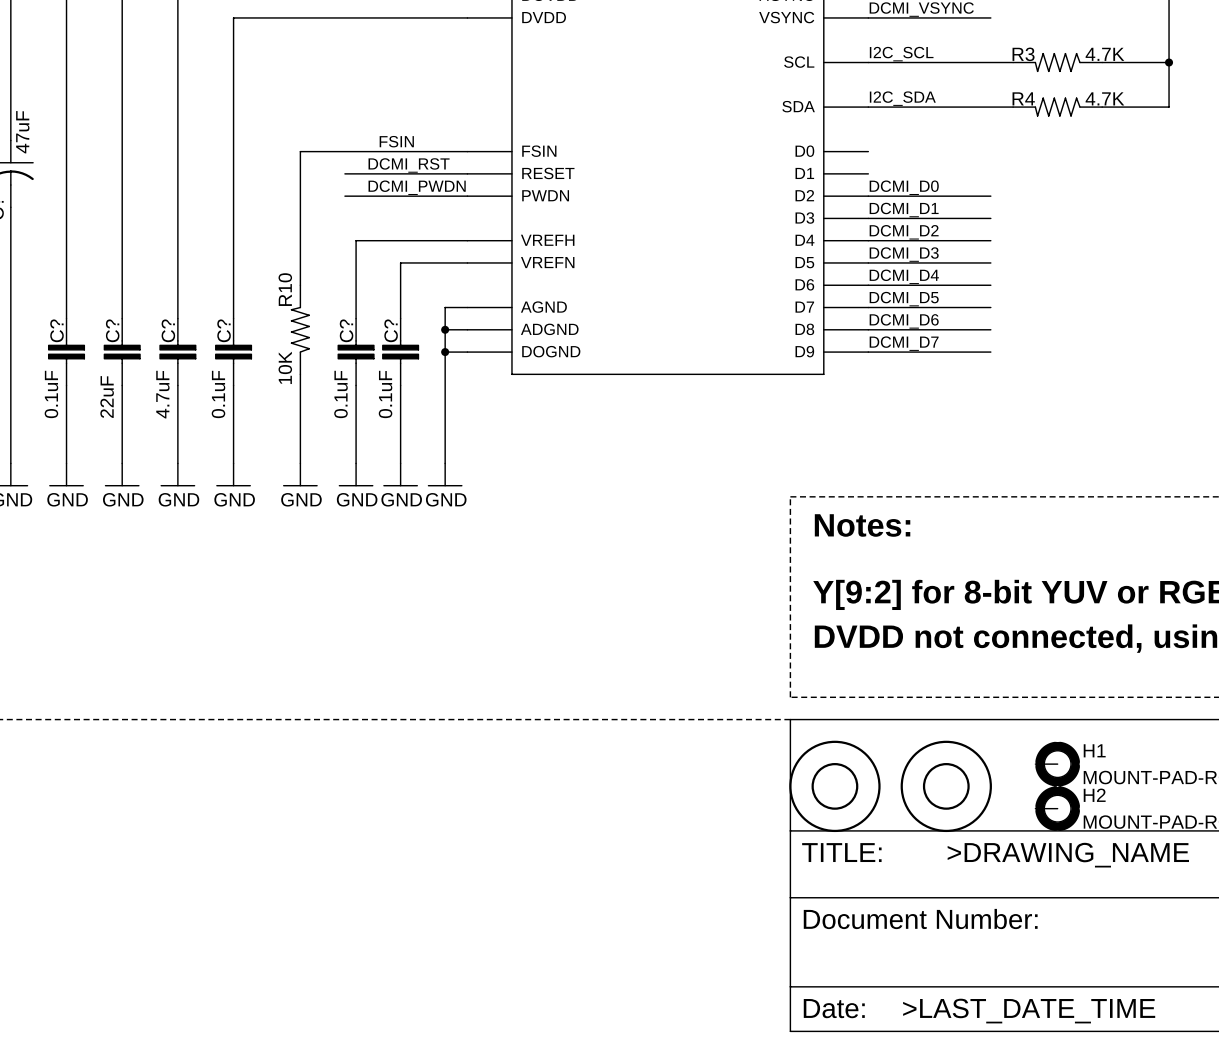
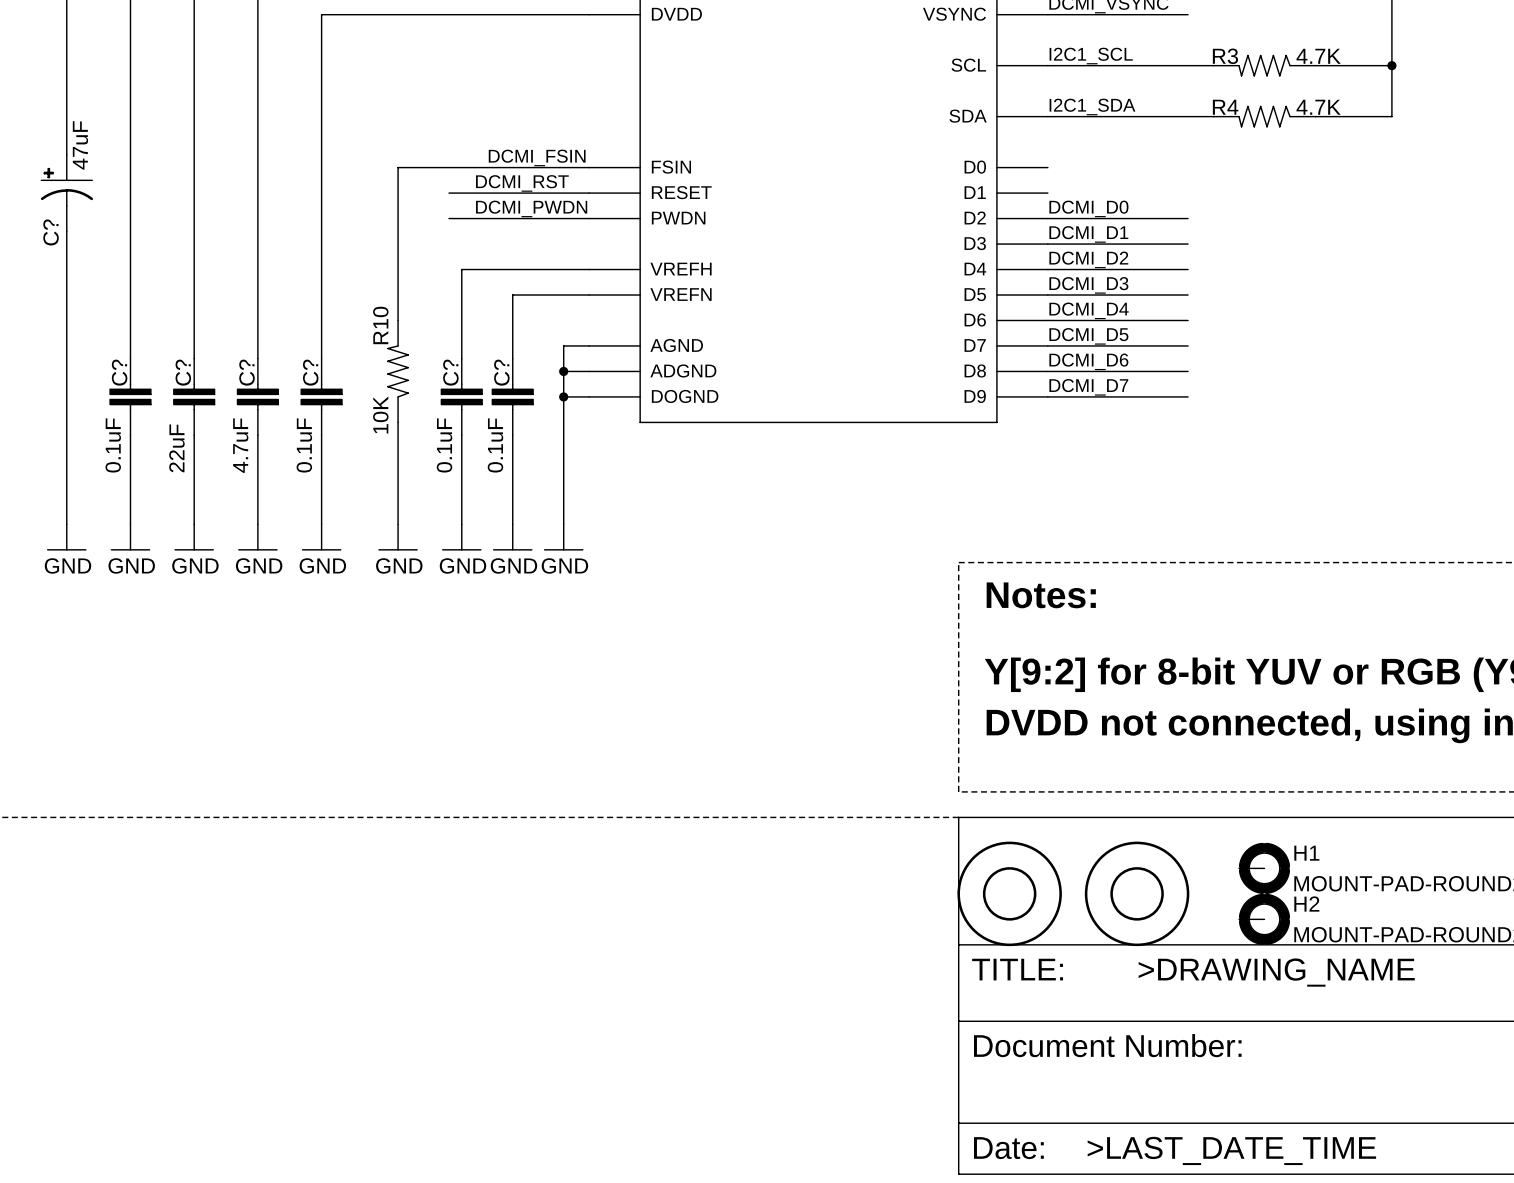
label: I2C_SCL (901, 54) -> I2C1_SCL (1091, 56)
label: I2C_SDA (902, 98) -> I2C1_SDA (1092, 107)
label: FSIN (396, 141) -> DCMI_FSIN (537, 157)

